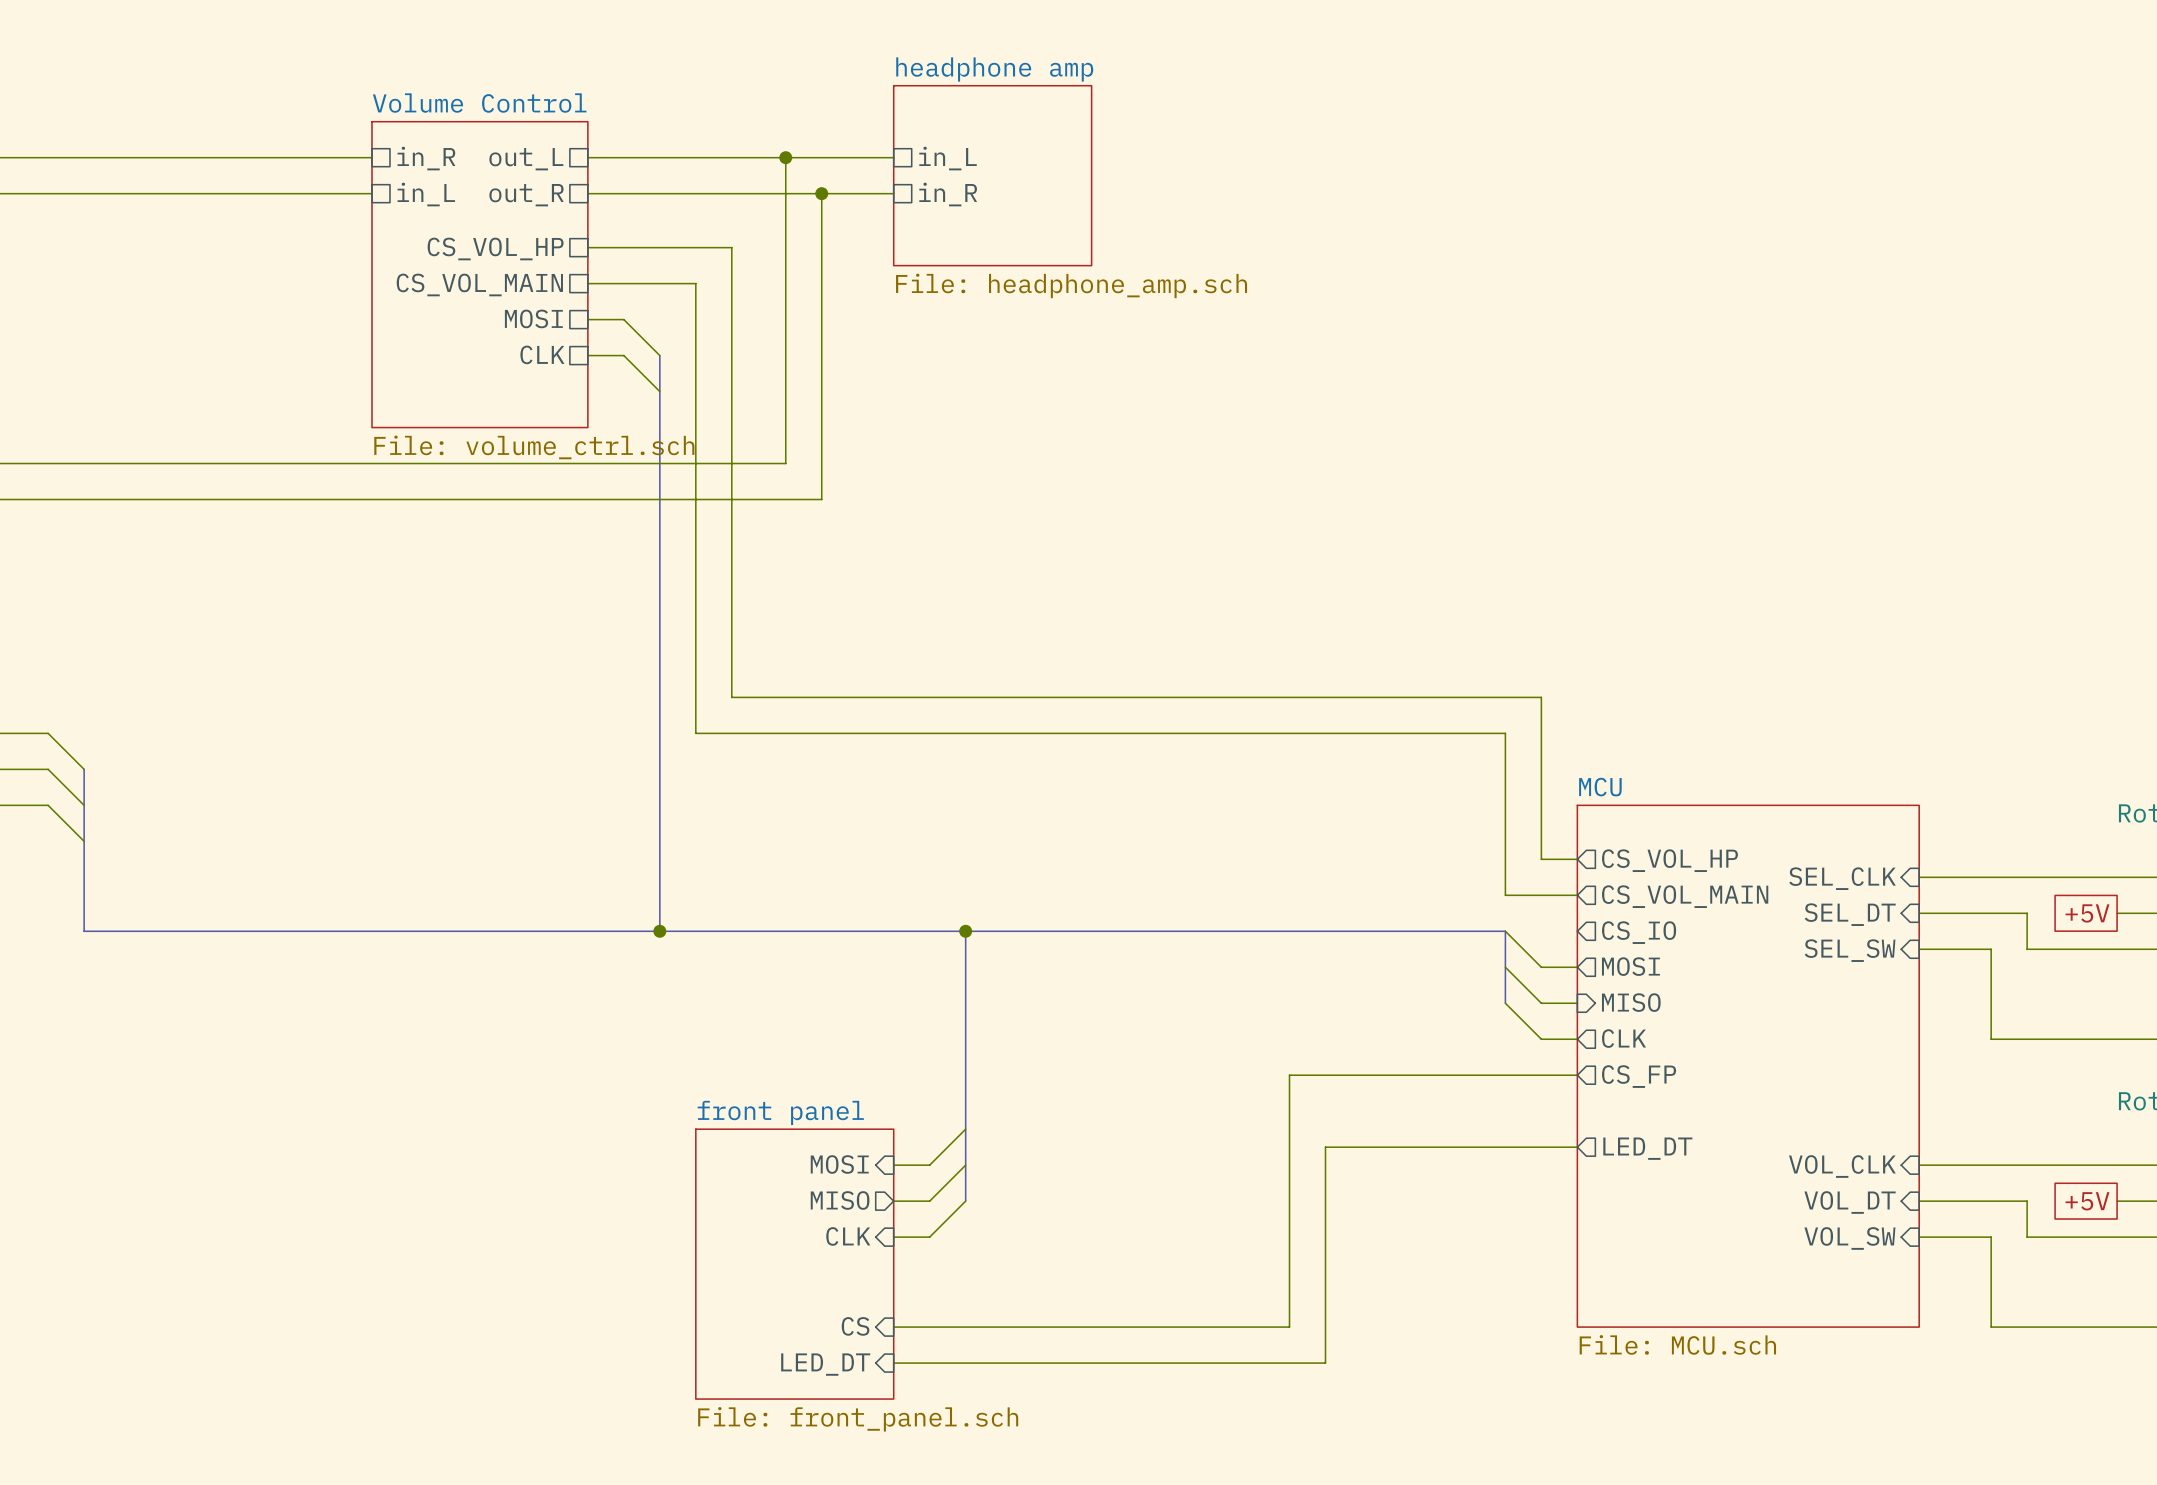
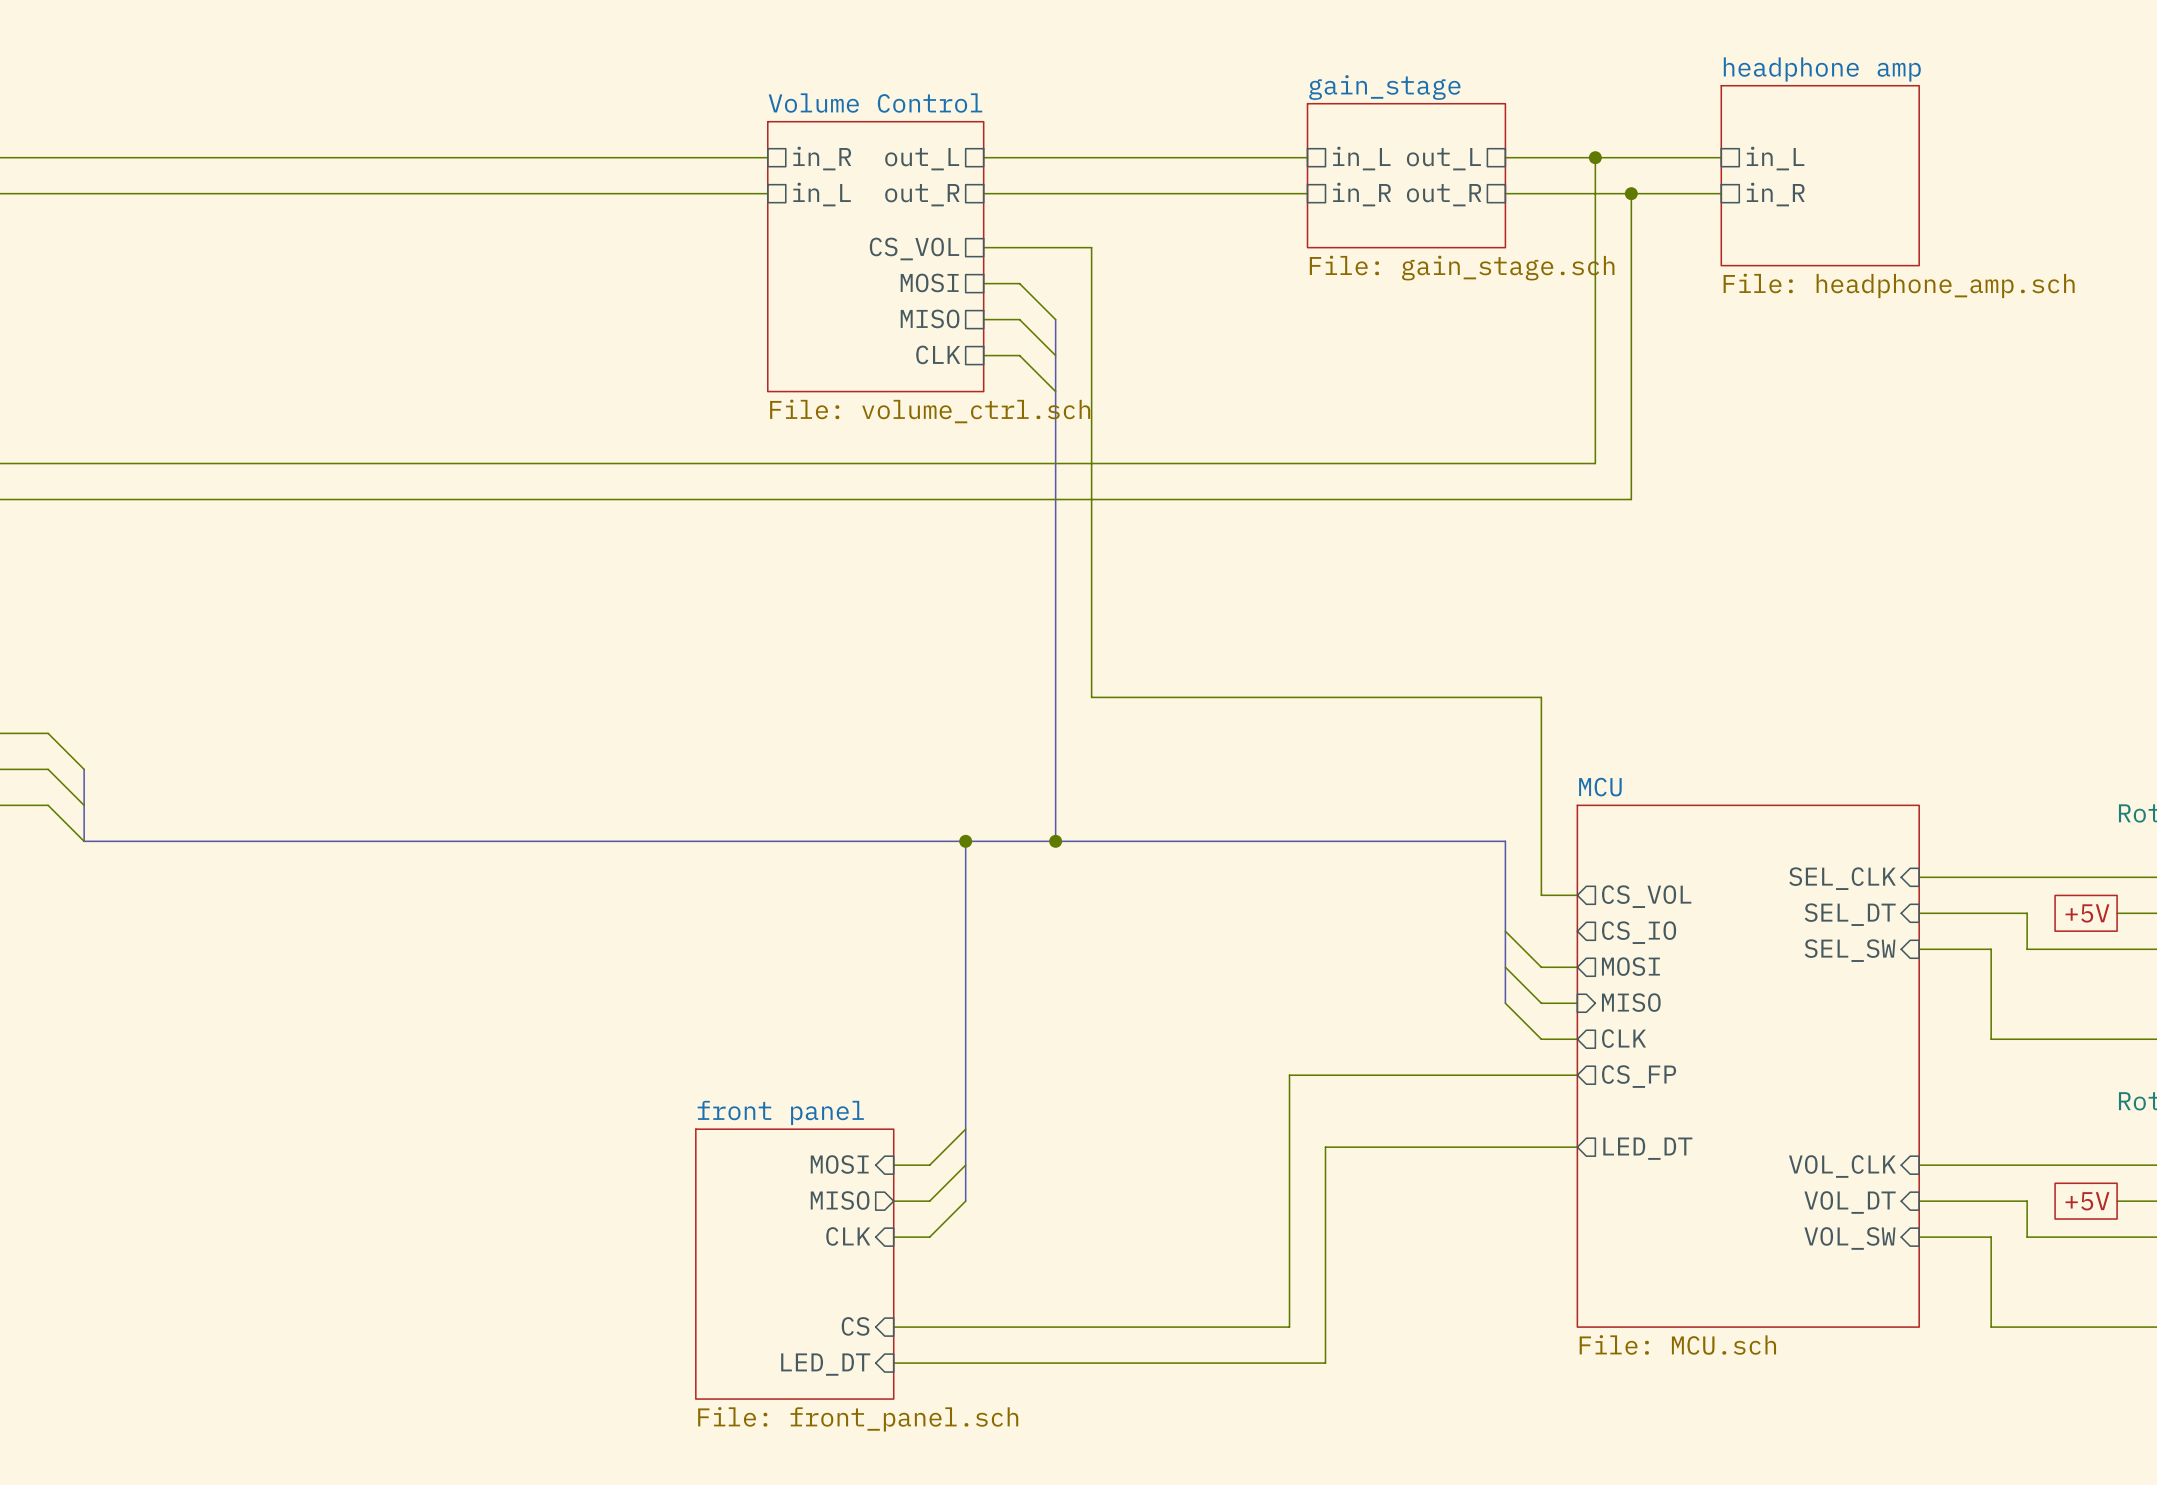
wire: none -> (371, 157) (587, 157)
wire: (767, 157) (893, 157) -> none
wire: (785, 157) (785, 463) -> (1595, 157) (1595, 463) (785, 463)
junction: (785, 157) -> none
wire: none -> (983, 157) (1307, 157)
wire: none -> (1505, 157) (1721, 157)
junction: none -> (1595, 157)
sheet pin: in_R (426, 158) -> none
sheet pin position: in_L (948, 158) -> in_L (822, 194)
sheet pin: none -> in_L (1361, 158)
sheet pin: none -> in_L (1775, 158)
sheet pin: out_L (526, 159) -> none
sheet pin: none -> out_L (922, 159)
sheet pin: none -> out_L (1443, 159)
sheet headphone amp: File: headphone_amp.sch (992, 175) -> none
sheet gain_stage: none -> File: gain_stage.sch (1406, 175)
sheet headphone amp: none -> File: headphone_amp.sch (1820, 175)
wire: none -> (371, 193) (587, 193)
wire: (767, 193) (893, 193) -> none
wire: (821, 193) (821, 499) -> (1631, 193) (1631, 499) (821, 499)
junction: (821, 193) -> none
wire: none -> (983, 193) (1307, 193)
wire: none -> (1505, 193) (1721, 193)
junction: none -> (1631, 193)
sheet pin: in_L (426, 194) -> none
sheet pin position: in_R (948, 194) -> in_R (822, 158)
sheet pin: none -> in_R (1361, 194)
sheet pin: none -> in_R (1775, 194)
sheet pin: out_R (526, 195) -> none
sheet pin: none -> out_R (922, 195)
sheet pin: none -> out_R (1444, 195)
wire: (587, 247) (731, 247) (731, 697) (1091, 697) -> (983, 247) (1091, 247) (1091, 697)
sheet pin: CS_VOL_HP (495, 248) -> none
sheet pin: none -> CS_VOL (914, 248)
sheet Volume Control: none -> File: volume_ctrl.sch (875, 256)
sheet Volume Control: File: volume_ctrl.sch (479, 274) -> none
sheet pin: none -> MOSI (929, 282)
wire: (587, 283) (695, 283) (695, 733) (1505, 733) (1505, 895) (1541, 895) -> none
wire: none -> (983, 283) (1019, 283) (1055, 319)
sheet pin: CS_VOL_MAIN (479, 284) -> none
sheet pin: MOSI (533, 318) -> none
sheet pin: none -> MISO (930, 318)
wire: (587, 319) (623, 319) (659, 355) -> none
wire: none -> (983, 319) (1019, 319) (1055, 355)
bus: none -> (1055, 319) (1055, 841)
sheet pin: CLK (542, 354) -> none
sheet pin: none -> CLK (938, 354)
wire: (587, 355) (623, 355) (659, 391) -> none
bus: (659, 355) (659, 931) -> none
wire: none -> (983, 355) (1019, 355) (1055, 391)
bus: (84, 841) (84, 931) (1505, 931) -> (84, 841) (1505, 841) (1505, 931)
bus: none -> (965, 841) (965, 931)
junction: none -> (965, 841)
junction: none -> (1055, 841)
wire: (1541, 859) (1577, 859) -> (1541, 859) (1541, 895)
sheet pin: CS_VOL_HP (1669, 860) -> none
sheet pin: CS_VOL_MAIN (1685, 896) -> CS_VOL (1646, 896)
junction: (659, 931) -> none
junction: (965, 931) -> none

